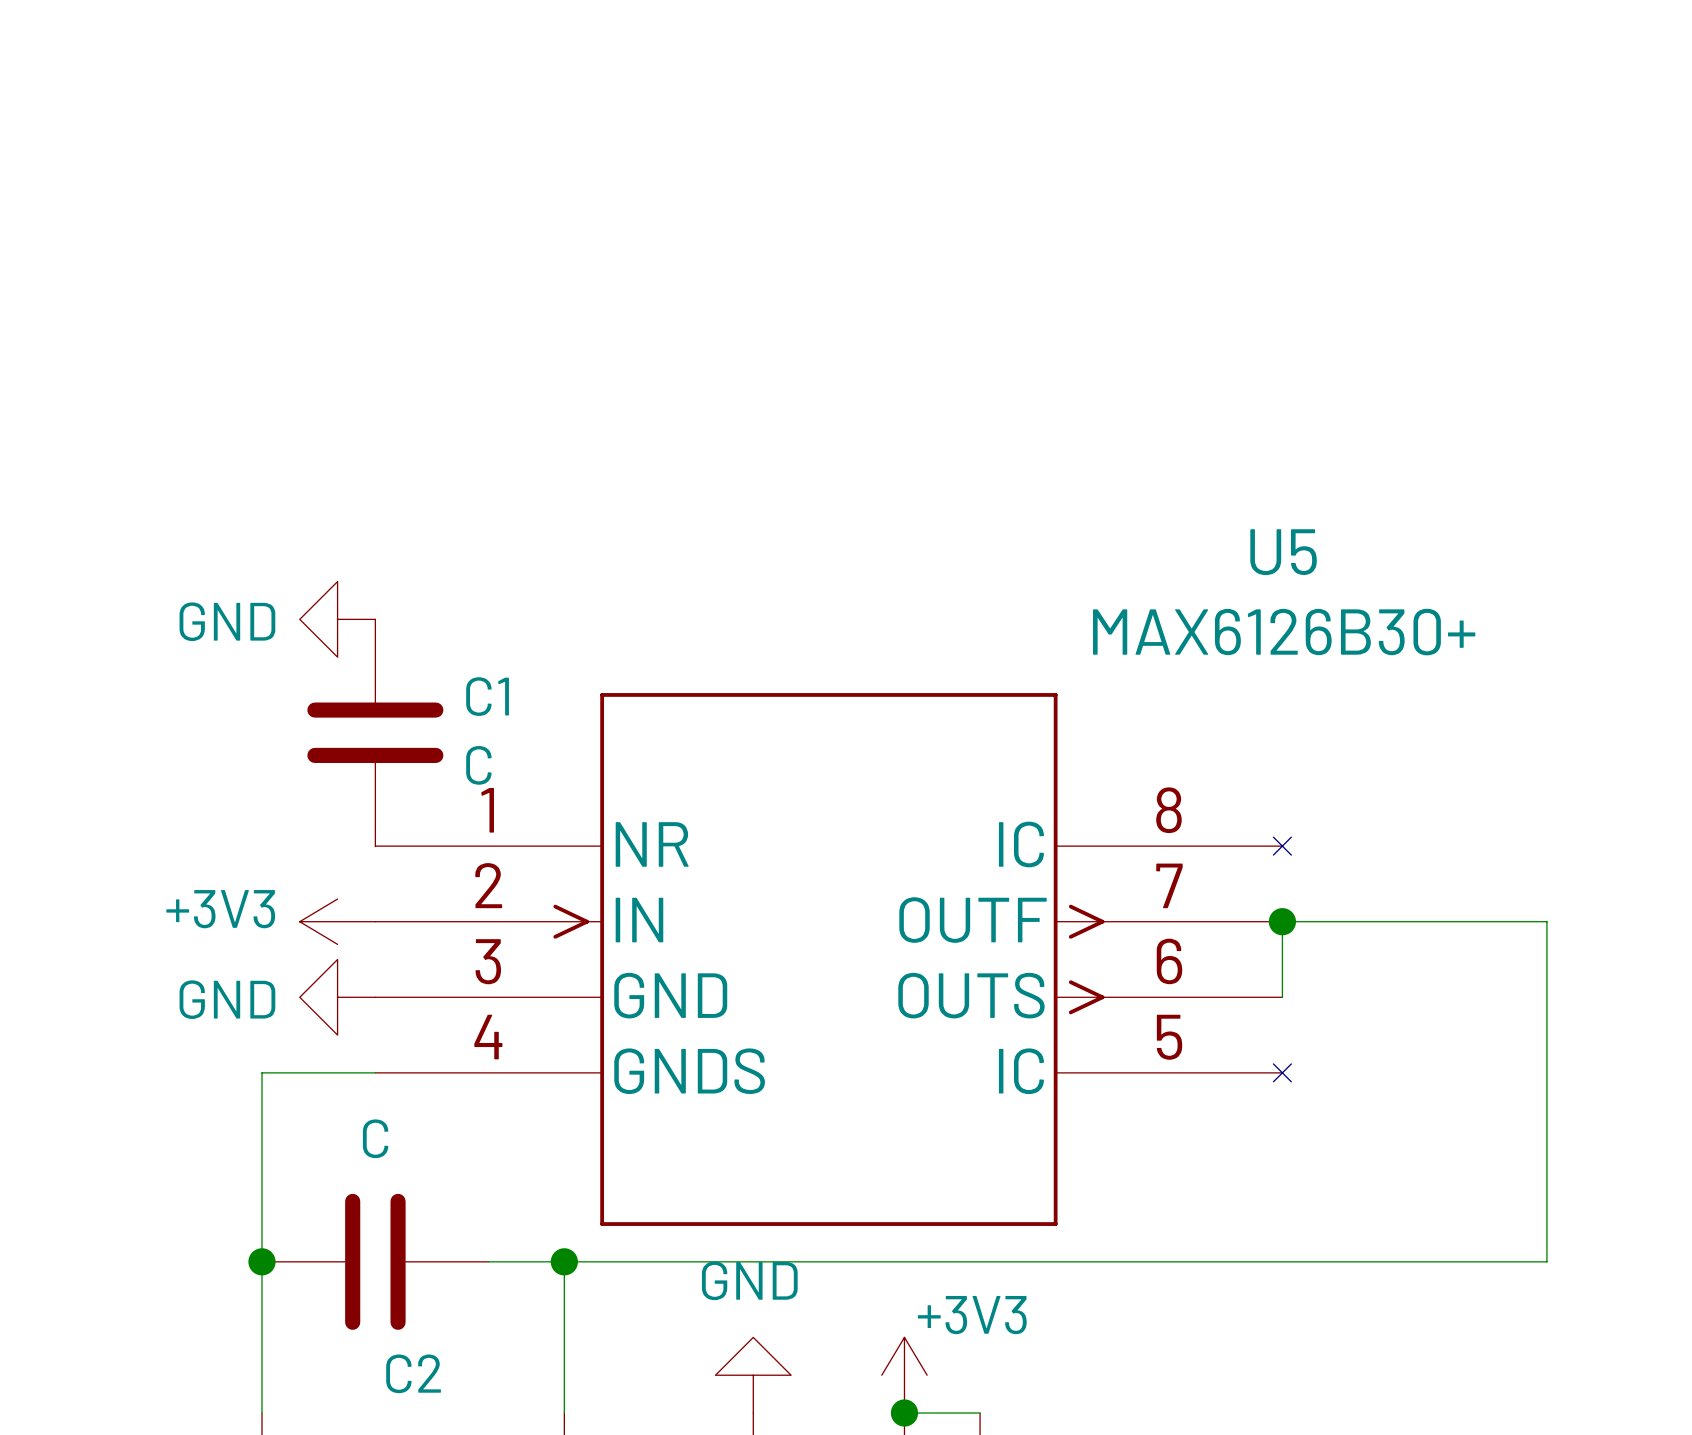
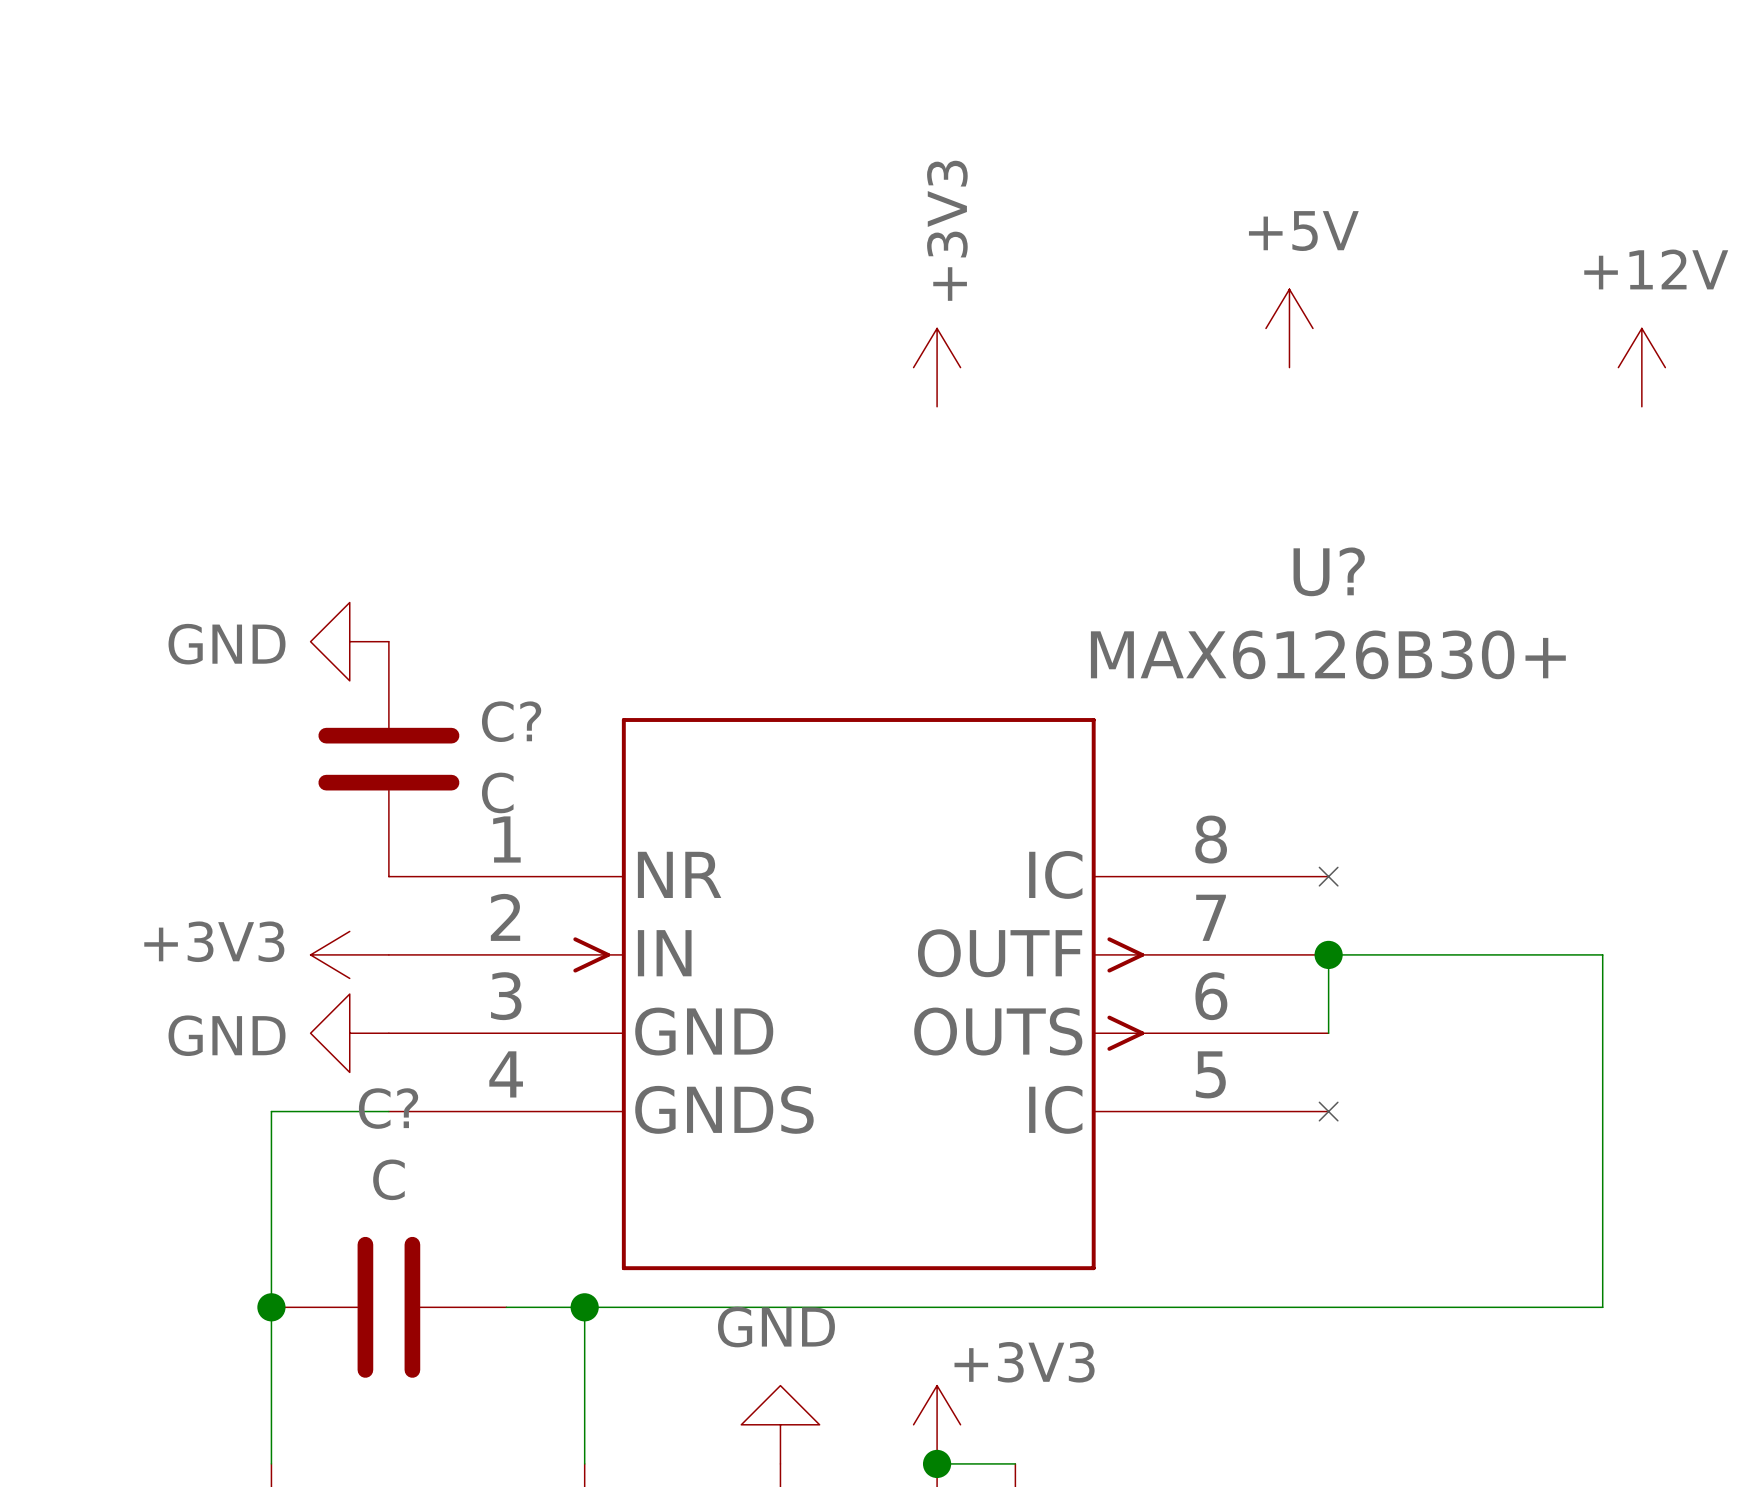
power symbol: none -> +5V (1289, 328)
power symbol: none -> +3V3 (937, 367)
power symbol: none -> +12V (1641, 367)
U5 name: U5 (1283, 552) -> U? (1329, 571)
C1 name: C1 (487, 696) -> C? (511, 721)
C2 name: C2 (413, 1373) -> C? (388, 1108)

